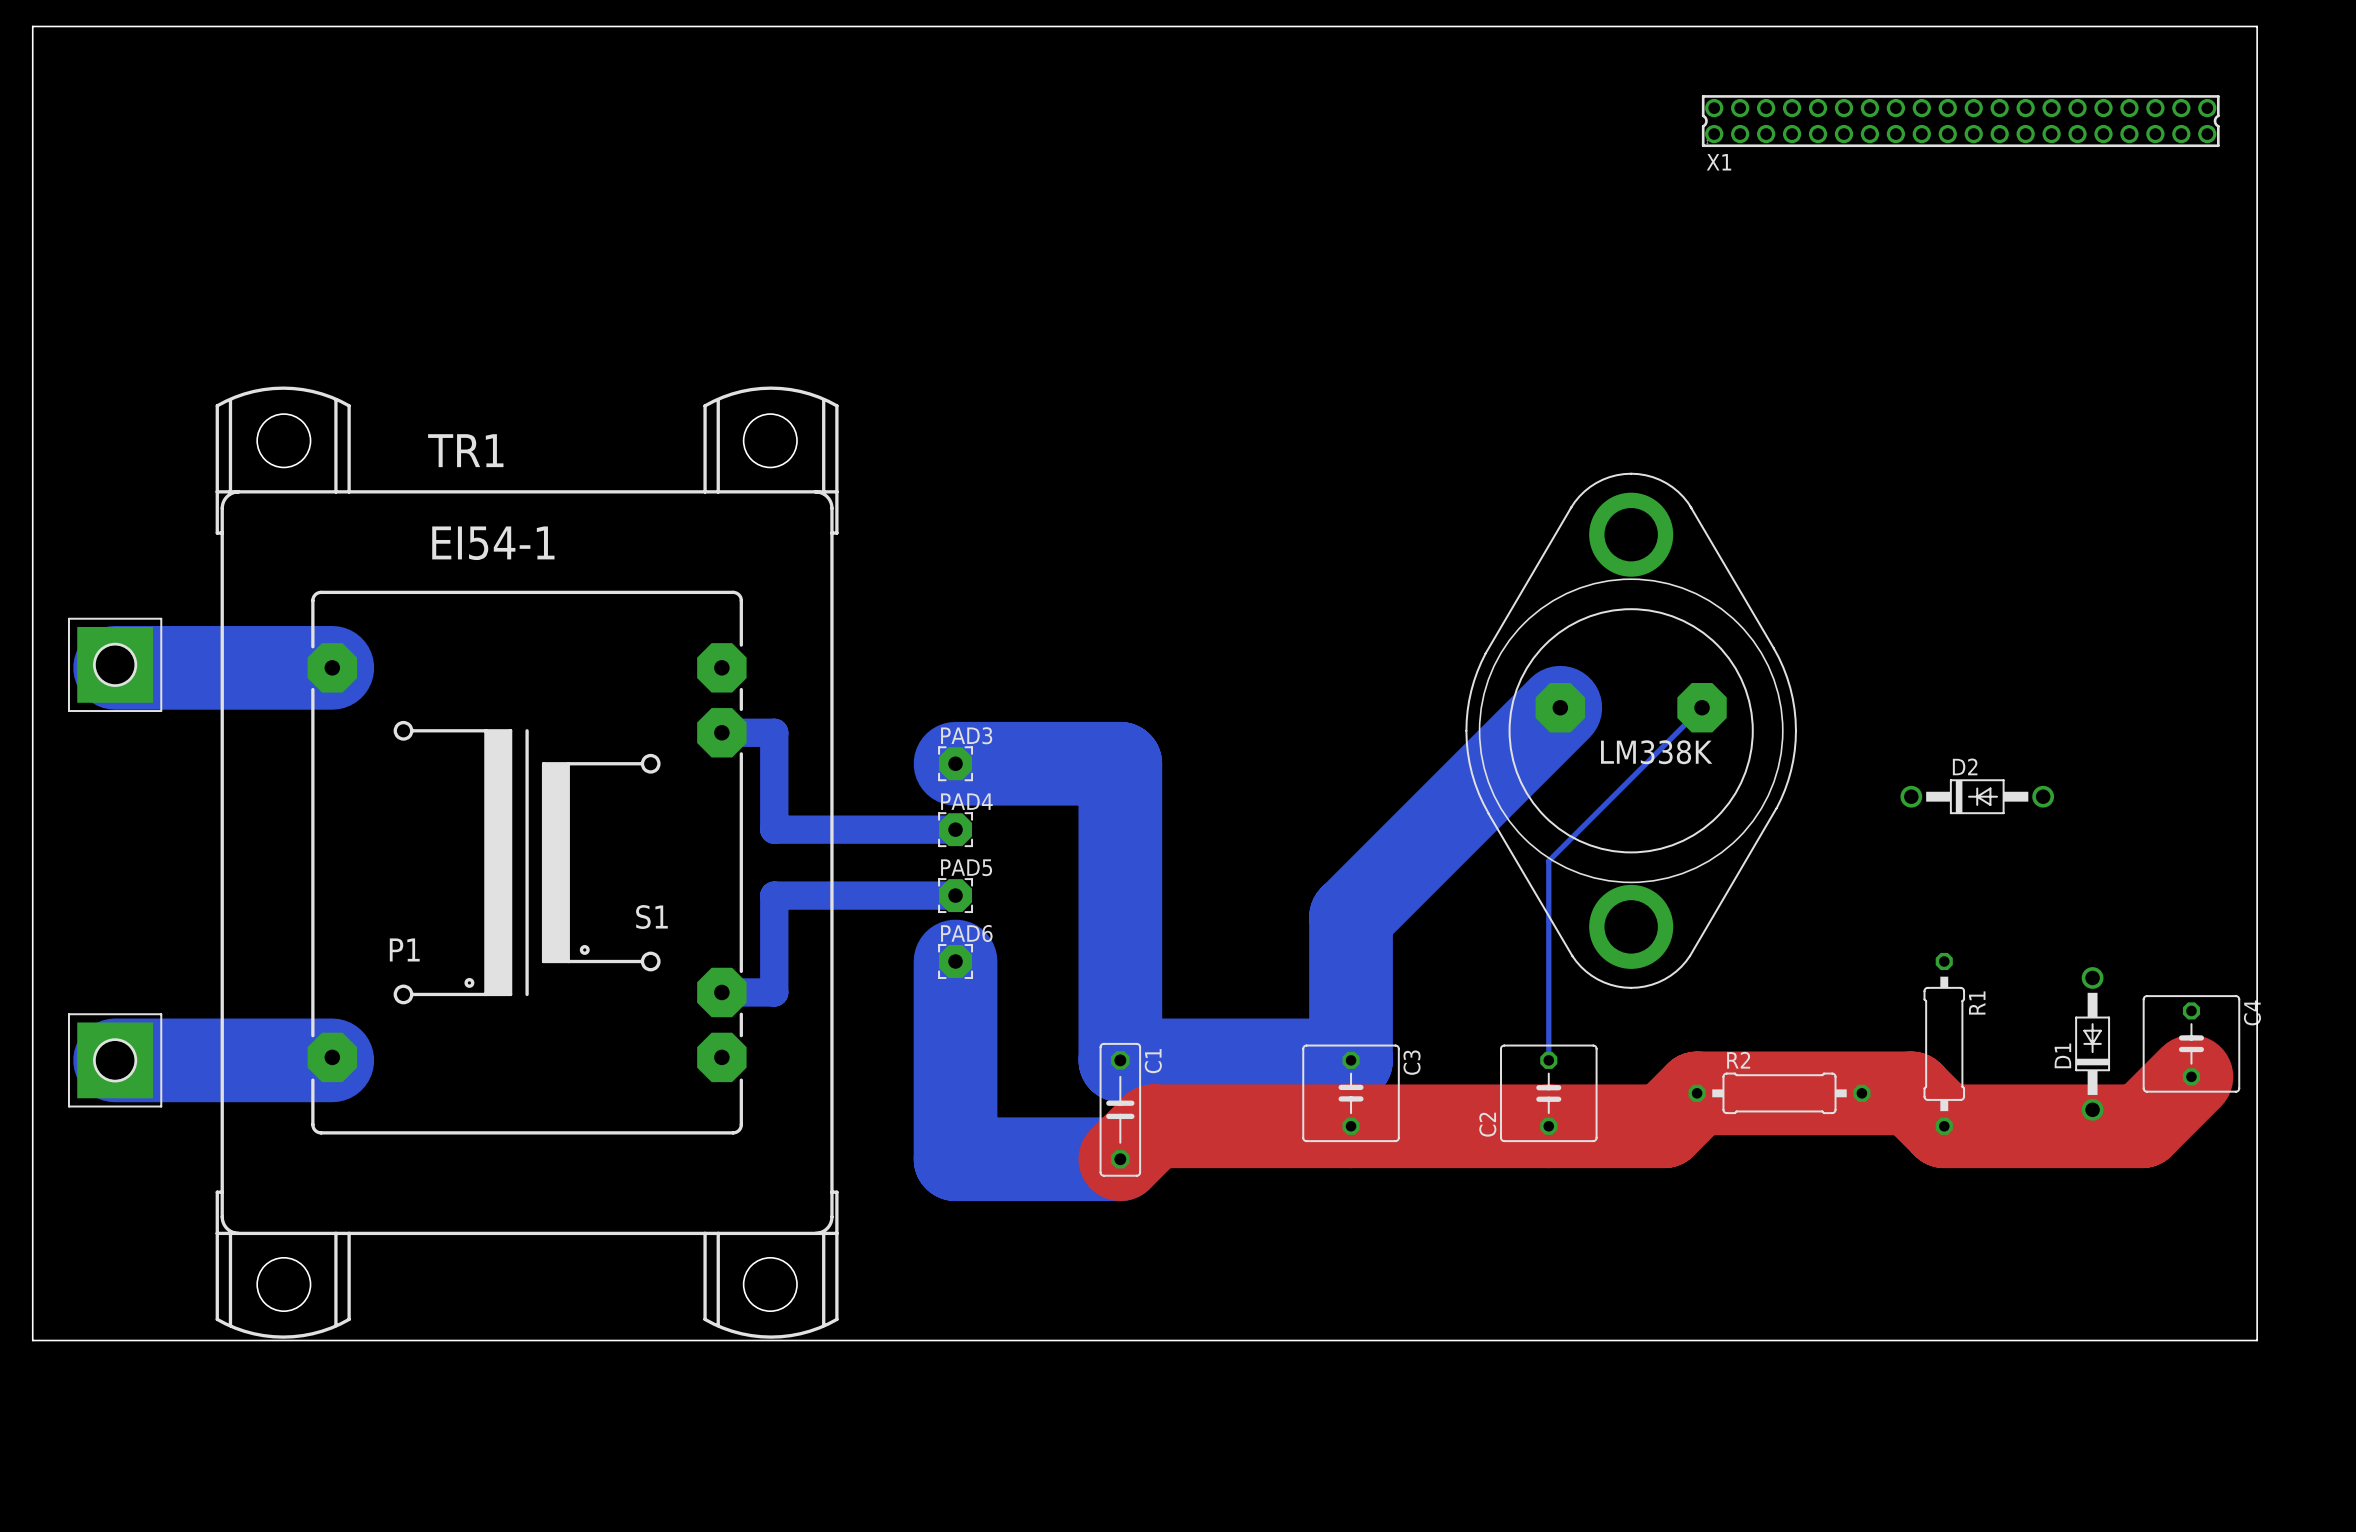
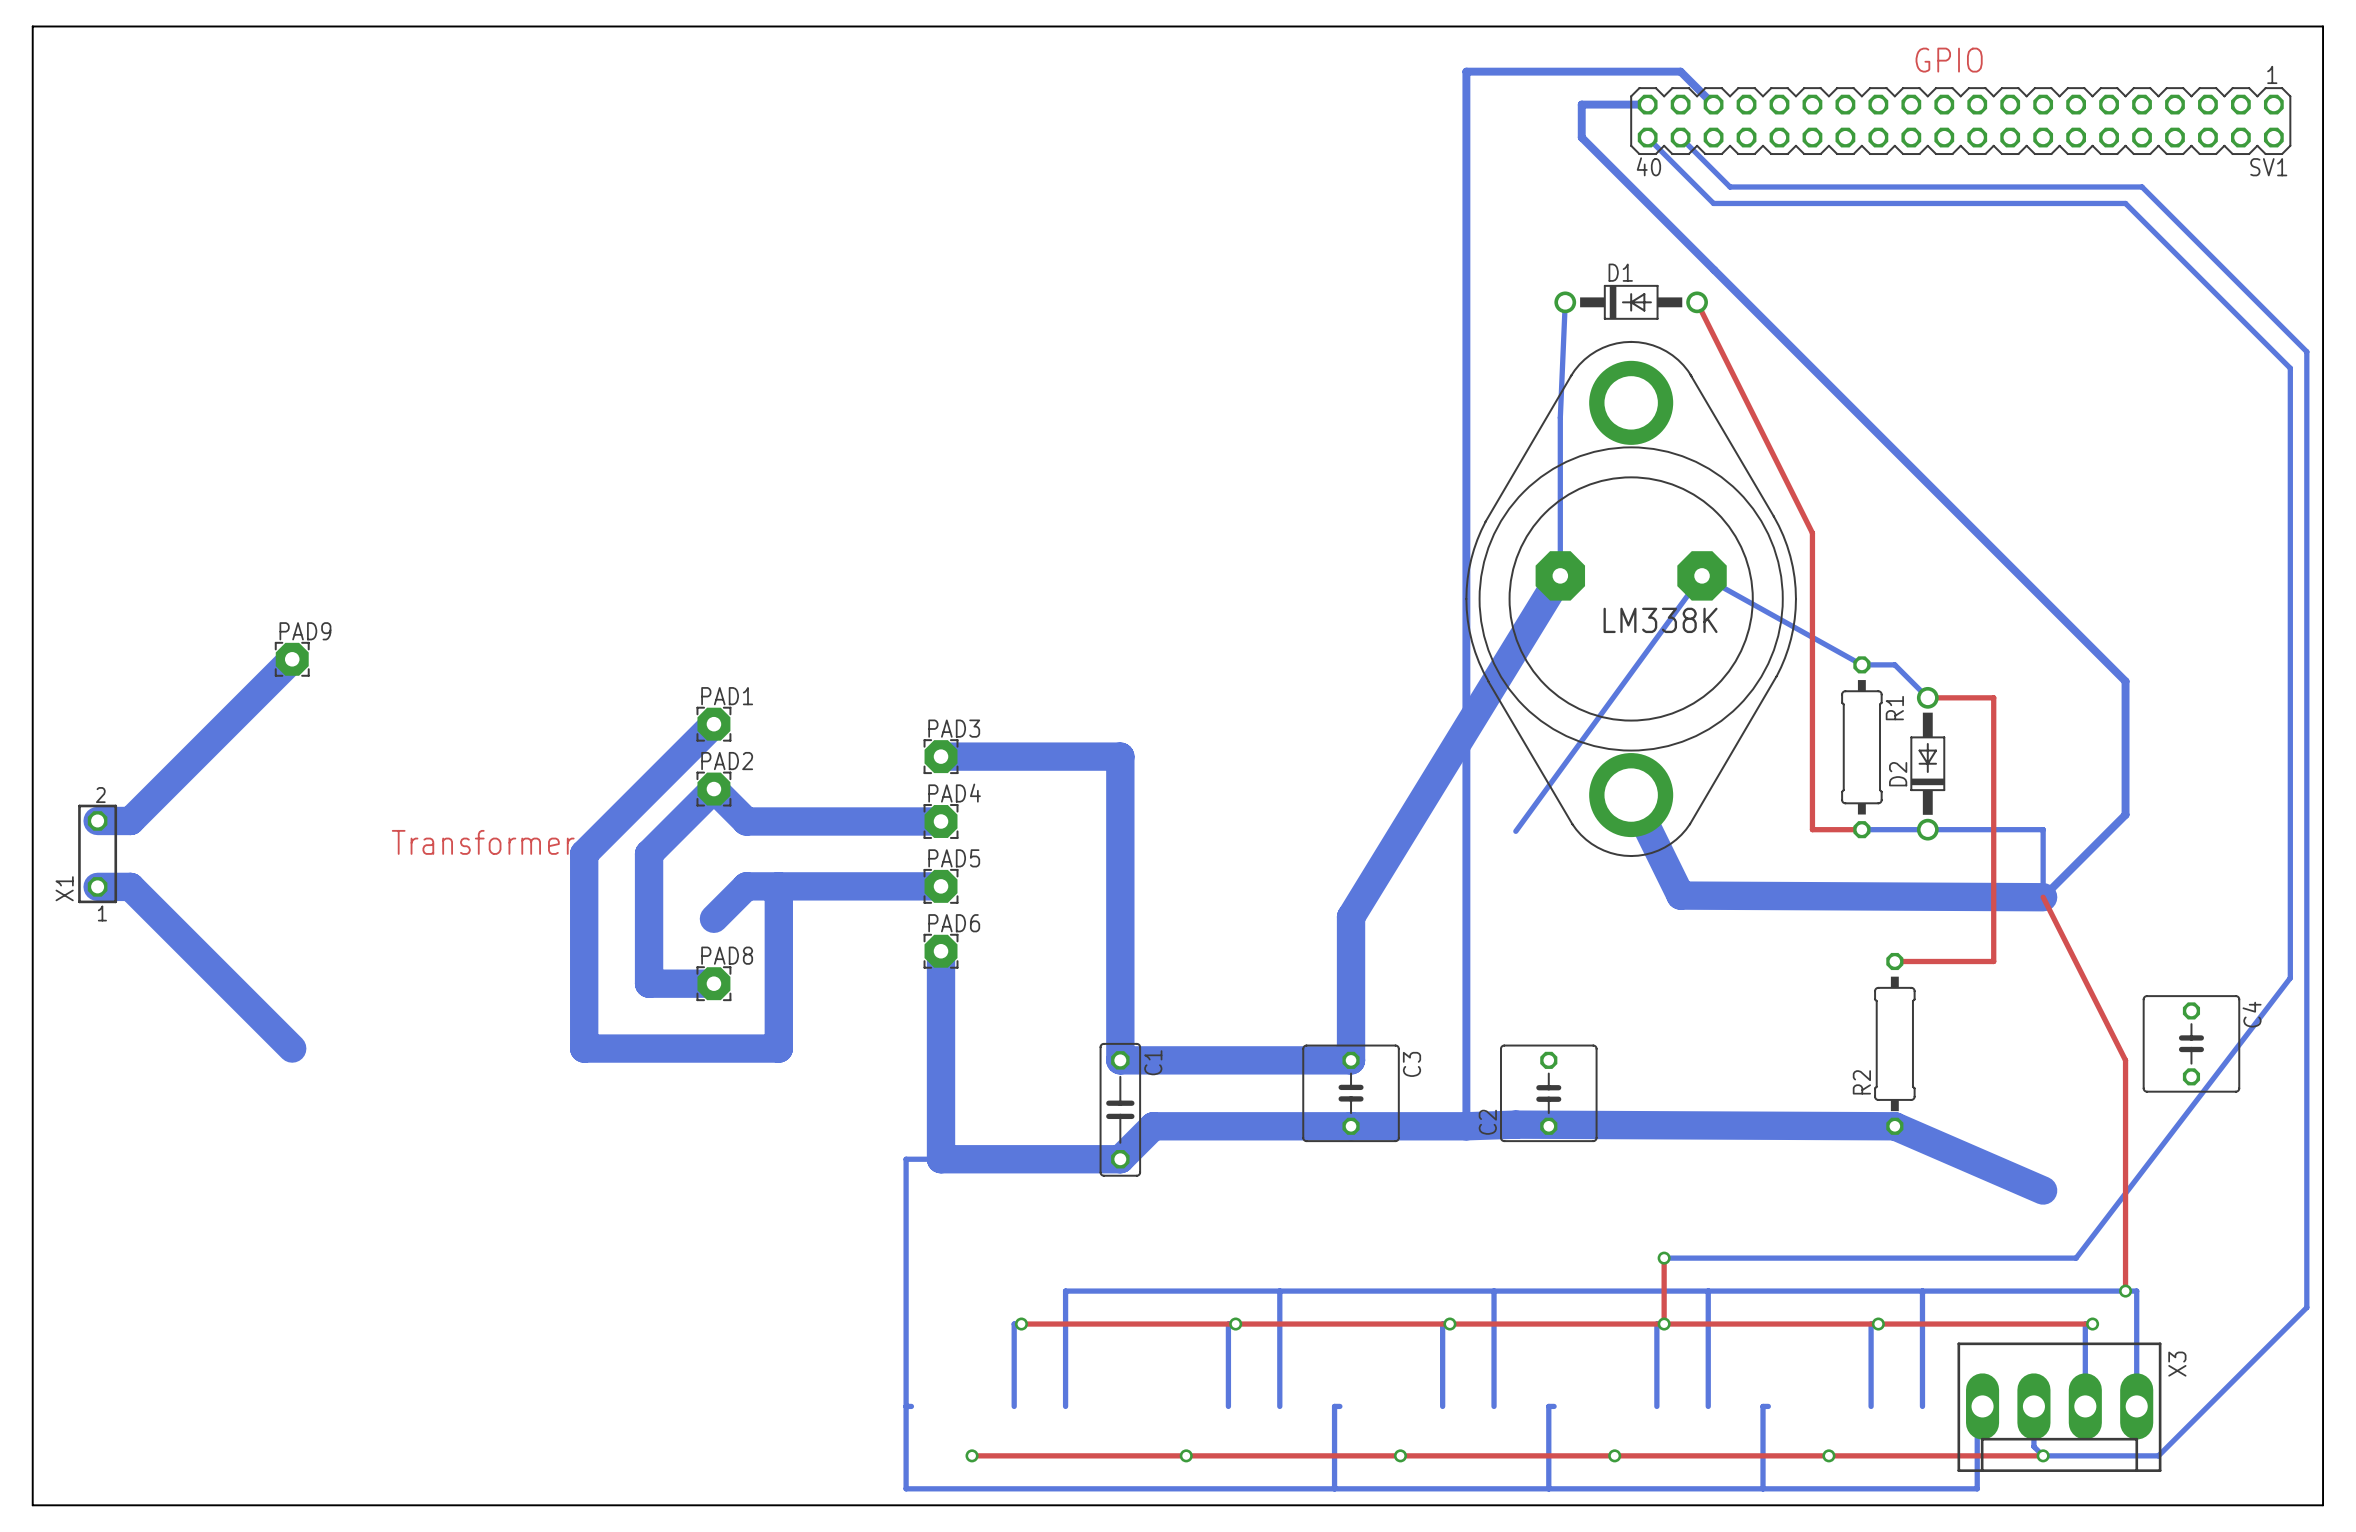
board edge: (2257, 26) (2257, 1340) (32, 1340) -> (2257, 26) (2323, 26) (2323, 1505) (32, 1505) (32, 1340)
text: none -> GPIO (1949, 60)
X1 footprint: [1701, 95, 2220, 148] -> [78, 804, 118, 904]
bottom track: none -> (1647, 104) (1581, 104) (1581, 137) (2125, 681) (2125, 814) (2043, 897)
bottom track: none -> (1713, 104) (1680, 71) (1466, 71) (1466, 1126)
SV1: none -> (1960, 121)
bottom track: none -> (1647, 137) (1713, 203) (2125, 203) (2290, 368) (2290, 977) (2076, 1258) (1664, 1258)
bottom track: none -> (1680, 137) (1730, 186) (2142, 186) (2306, 351) (2306, 1307) (2158, 1455) (2043, 1455) (2033, 1446) (2033, 1406)
X1 name position: X1 (1718, 162) -> X1 (64, 888)
top track: none -> (1697, 302) (1812, 533) (1812, 829) (1861, 829)
bottom track: none -> (292, 659) (130, 820) (97, 820)
PAD9: none -> (292, 659)
bottom track: (115, 664) (115, 667) (332, 667) -> none
part: (115, 664) -> none
bottom track: none -> (1927, 697) (1894, 664) (1861, 664) (1702, 575) (1515, 831)
top track: none -> (1927, 697) (1993, 697) (1993, 961) (1894, 961)
bottom track: (1560, 707) (1351, 917) -> (1565, 302) (1560, 417) (1560, 575) (1351, 917)
bottom track: (1702, 707) (1548, 860) (1548, 1060) -> none
bottom track: none -> (713, 724) (584, 853) (584, 1048) (778, 1048) (778, 886)
PAD1: none -> (713, 724)
LM338K position: (1631, 730) -> (1631, 598)
bottom track: (721, 732) (774, 732) (774, 829) (955, 829) (939, 829) -> none
bottom track: (955, 763) (1120, 763) -> (941, 756) (1120, 756) (1120, 763)
PAD3 position: (955, 763) -> (941, 756)
bottom track width: thick (1120, 763) (1120, 1060) (1351, 1060) (1351, 917) -> thin (1120, 763) (1120, 1060) (1351, 1060) (1351, 917)
PAD2: none -> (713, 789)
bottom track: none -> (1631, 795) (1680, 895) (2043, 897)
D2 rotation: 0° (1977, 796) -> 90° counterclockwise (1927, 763)
bottom track: none -> (941, 821) (746, 821) (713, 789) (649, 853) (649, 983) (713, 983)
PAD4 position: (955, 829) -> (941, 821)
bottom track: none -> (1861, 829) (2043, 829) (2043, 897)
text: none -> Transformer (483, 842)
TR1: (527, 862) -> none
bottom track: none -> (97, 886) (130, 886) (292, 1048)
bottom track: none -> (941, 886) (746, 886) (713, 918)
bottom track: (955, 895) (774, 895) (774, 992) (721, 992) -> none
PAD5 position: (955, 895) -> (941, 886)
top track: none -> (2043, 897) (2125, 1060) (2125, 1291)
bottom track: none -> (941, 951) (941, 1159) (955, 1159) (906, 1159) (906, 1488) (1977, 1488) (1977, 1406) (1982, 1406)
bottom track: (955, 961) (955, 1159) -> none
PAD6 position: (955, 961) -> (941, 951)
PAD8: none -> (713, 983)
R1 position: (1944, 1043) -> (1861, 747)
D1 rotation: 0° (2092, 1043) -> 90° clockwise (1631, 302)
D1 position: (2092, 1043) -> (1631, 302)
bottom track: (332, 1057) (332, 1060) (115, 1060) -> none
part: (115, 1060) -> none
R2 name position: R2 (1738, 1060) -> R2 (1861, 1082)
top track: (2191, 1076) (2142, 1126) (1944, 1126) (1911, 1093) (1697, 1093) (1664, 1126) (1153, 1126) (1120, 1159) -> none
R2 rotation: 0° (1779, 1093) -> 90° clockwise (1894, 1043)
R2 position: (1779, 1093) -> (1894, 1043)
bottom track: none -> (1466, 1126) (1153, 1126) (1120, 1159) (1125, 1159)
bottom track: none -> (1466, 1126) (1515, 1124) (1894, 1126) (2043, 1190)
bottom track width: thick (955, 1159) (1120, 1159) -> thin (955, 1159) (1120, 1159)
top track: none -> (1664, 1258) (1664, 1324)
via: none -> (1664, 1258)
bottom track: none -> (1279, 1291) (1279, 1406)
bottom track: none -> (1494, 1291) (1494, 1406)
bottom track: none -> (1708, 1291) (1708, 1406)
bottom track: none -> (1922, 1291) (1922, 1406)
via: none -> (2125, 1291)
bottom track: none -> (1021, 1324) (1014, 1324) (1014, 1406)
top track: none -> (1021, 1324) (2092, 1324)
via: none -> (1021, 1324)
bottom track: none -> (1235, 1324) (1228, 1324) (1228, 1406)
via: none -> (1235, 1324)
bottom track: none -> (1449, 1324) (1442, 1324) (1442, 1406)
via: none -> (1449, 1324)
bottom track: none -> (1664, 1324) (1656, 1324) (1656, 1406)
via: none -> (1664, 1324)
bottom track: none -> (1878, 1324) (1871, 1324) (1871, 1406)
via: none -> (1878, 1324)
bottom track: none -> (2092, 1324) (2085, 1324) (2085, 1406)
via: none -> (2092, 1324)
bottom track: none -> (906, 1406) (911, 1406)
bottom track: none -> (1065, 1406) (1065, 1291) (2136, 1291) (2136, 1406)
bottom track: none -> (1339, 1406) (1334, 1406) (1334, 1488)
bottom track: none -> (1554, 1406) (1548, 1406) (1548, 1488)
bottom track: none -> (1768, 1406) (1763, 1406) (1763, 1488)
X3: none -> (2059, 1407)
top track: none -> (972, 1455) (2043, 1455)
via: none -> (972, 1455)
via: none -> (1186, 1455)
via: none -> (1400, 1455)
via: none -> (1614, 1455)
via: none -> (1828, 1455)
via: none -> (2043, 1455)

